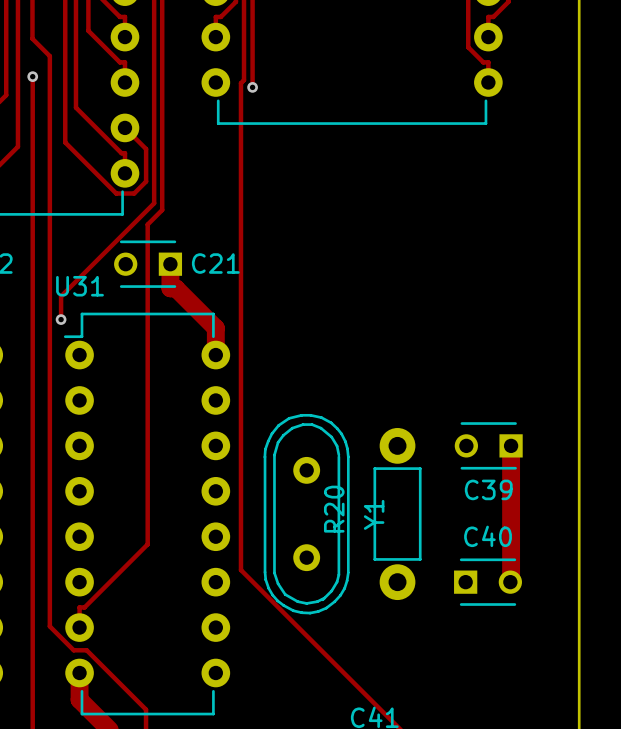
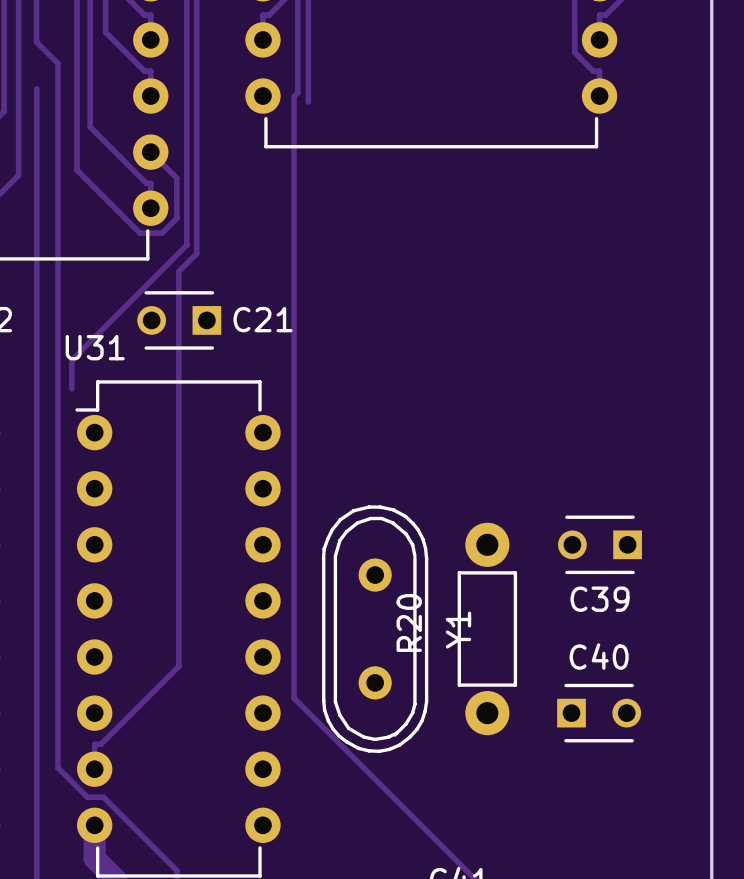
via: (32, 76) -> none
via: (252, 87) -> none
track: (170, 264) (170, 288) (175, 288) (215, 328) (215, 355) -> none
via: (61, 319) -> none
track: (511, 445) (510, 582) -> none

